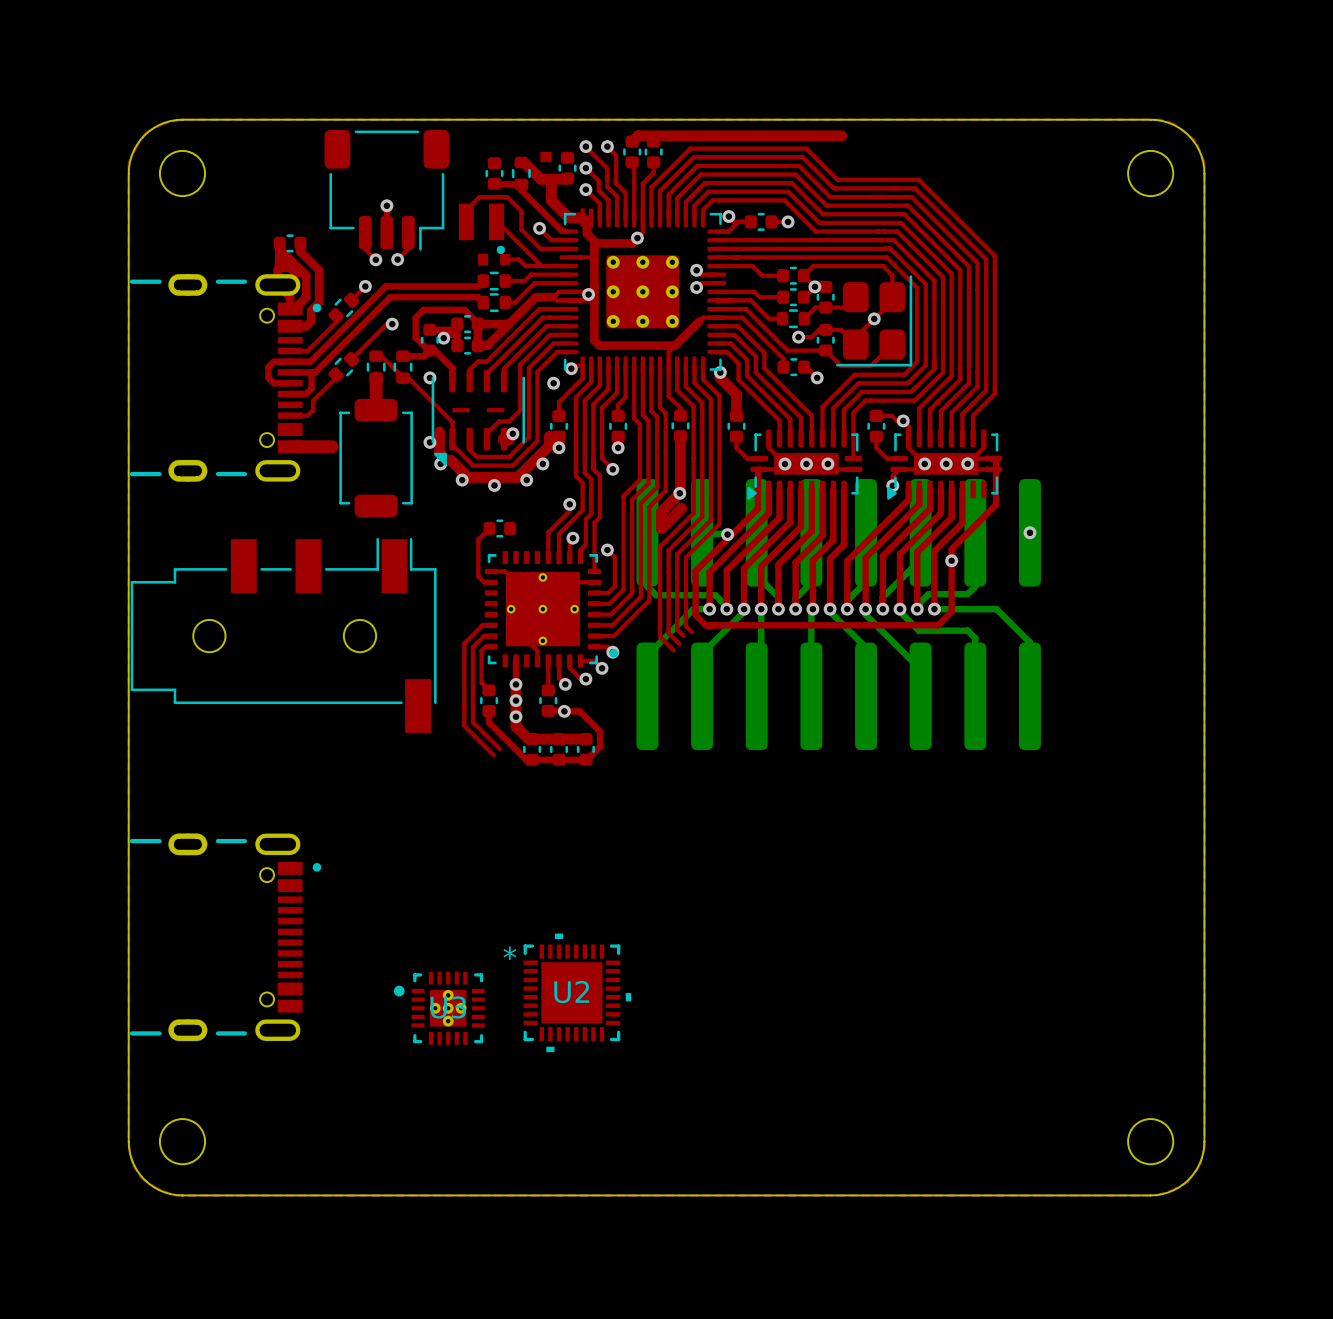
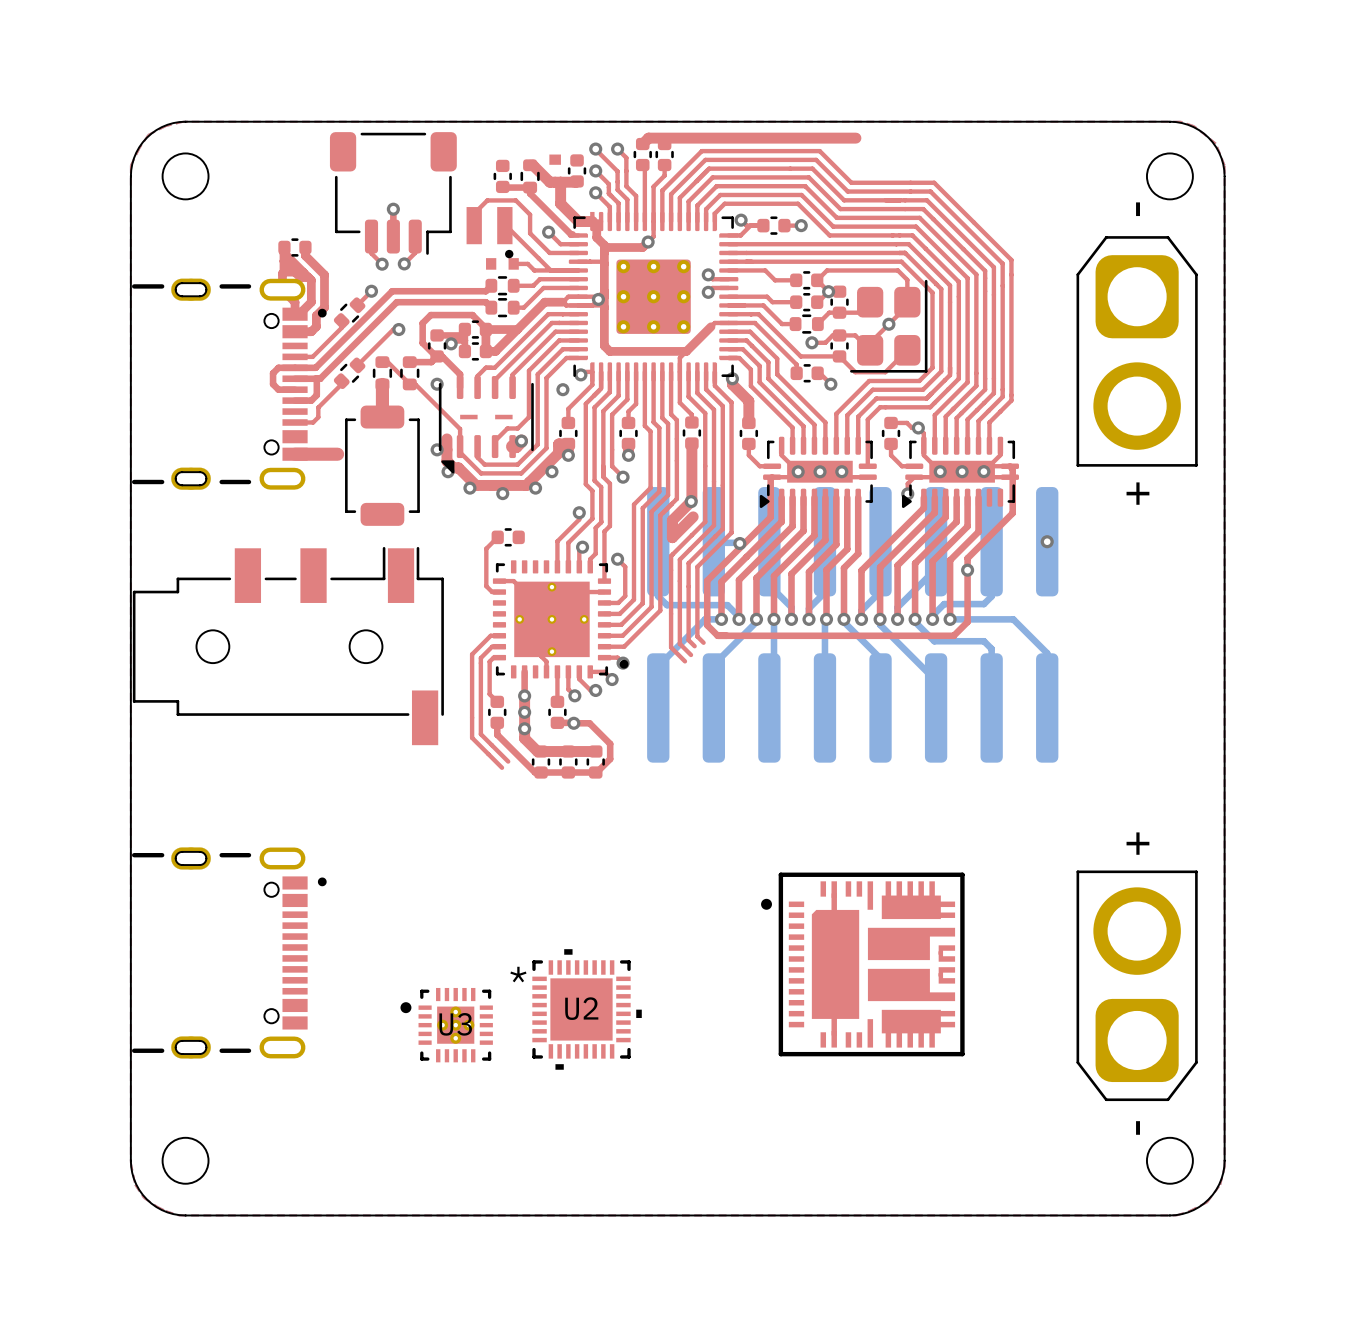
part: none -> (1137, 351)
part: none -> (862, 964)
part: none -> (1137, 985)

